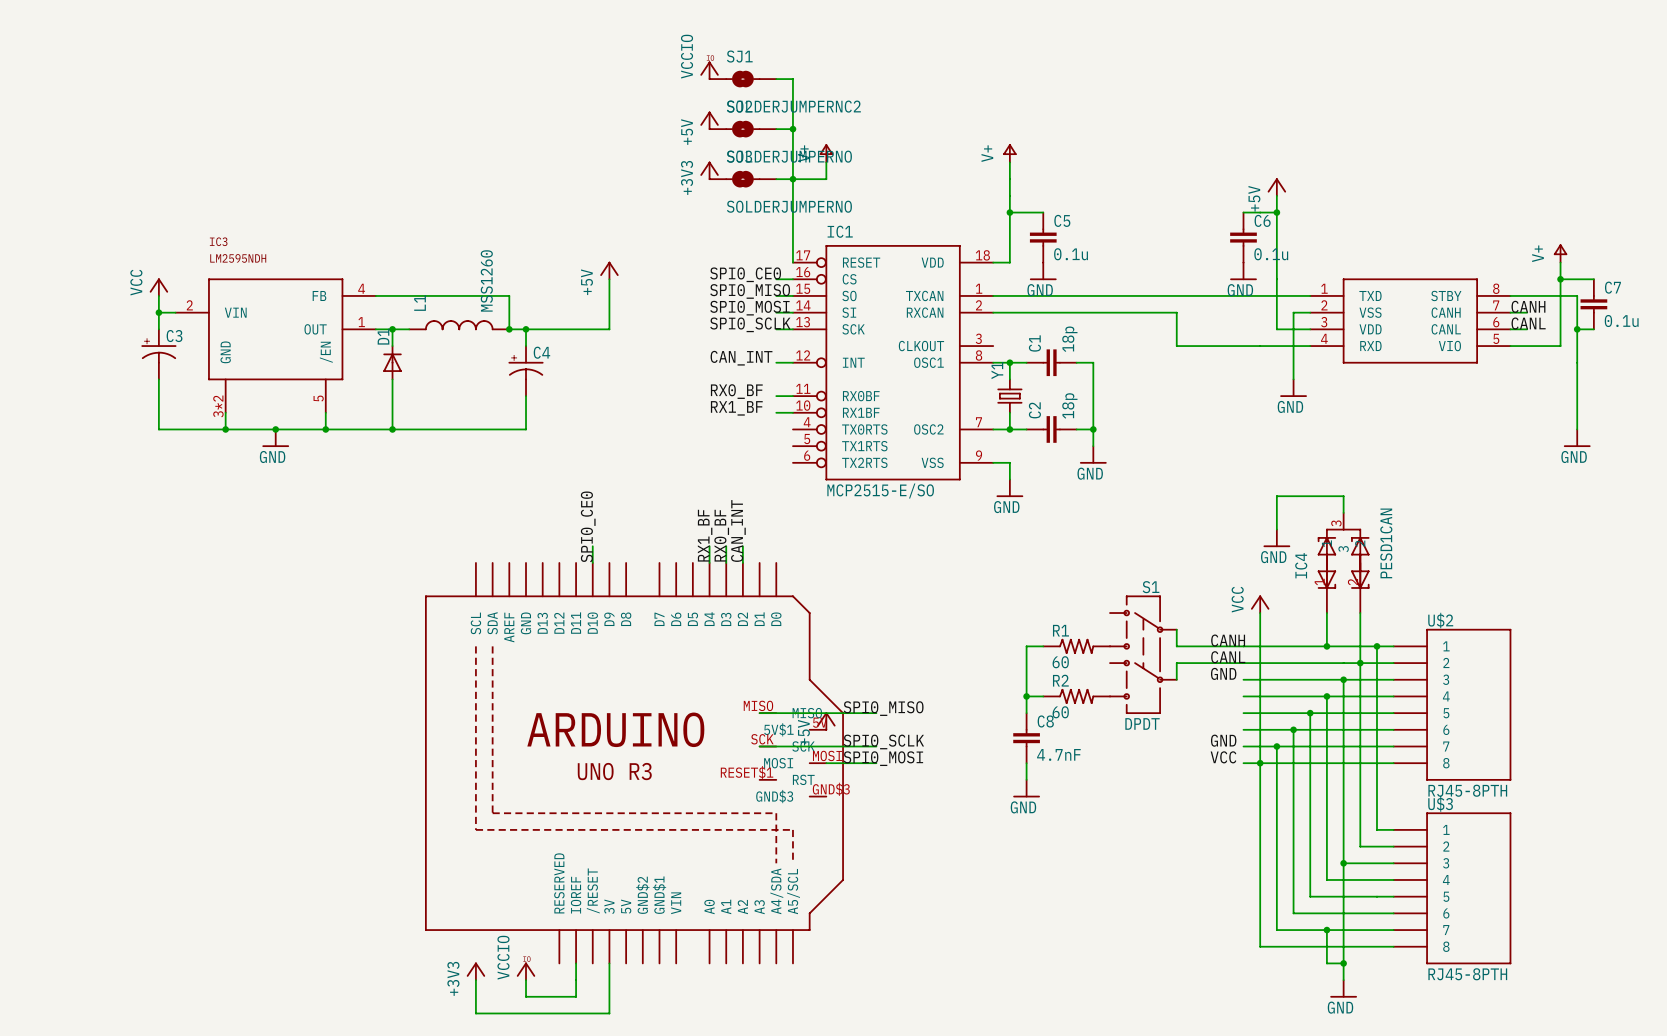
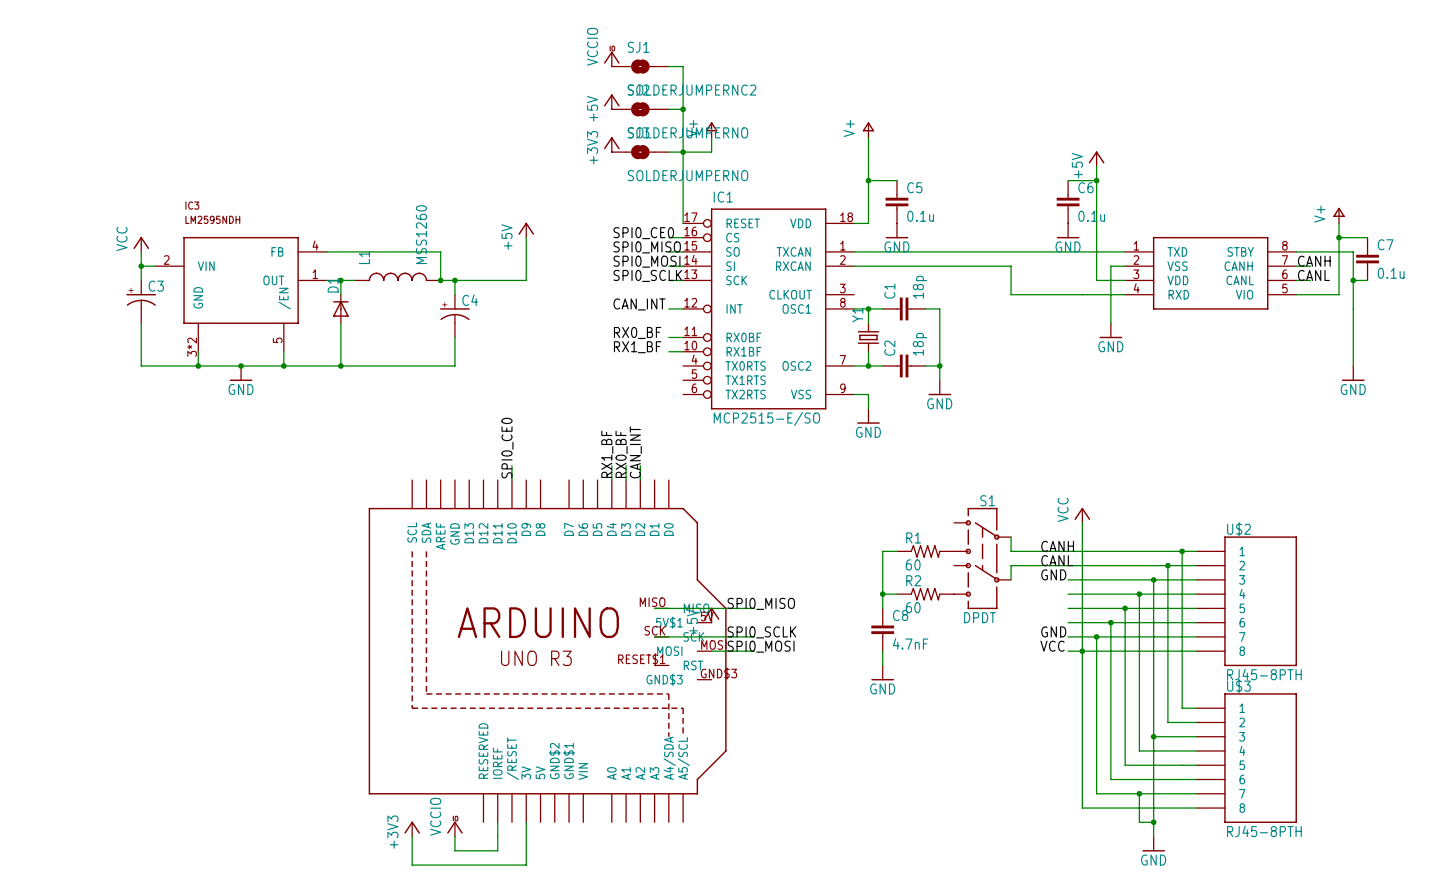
wire: (1343, 512) (1343, 496) (1276, 496) (1276, 529) -> none
power symbol: GND (1276, 538) -> none
IC4: PESD1CAN (1343, 562) -> none
wire: (1326, 613) (1326, 646) -> none
wire: (1360, 613) (1360, 663) -> none
junction: (1326, 646) -> none

